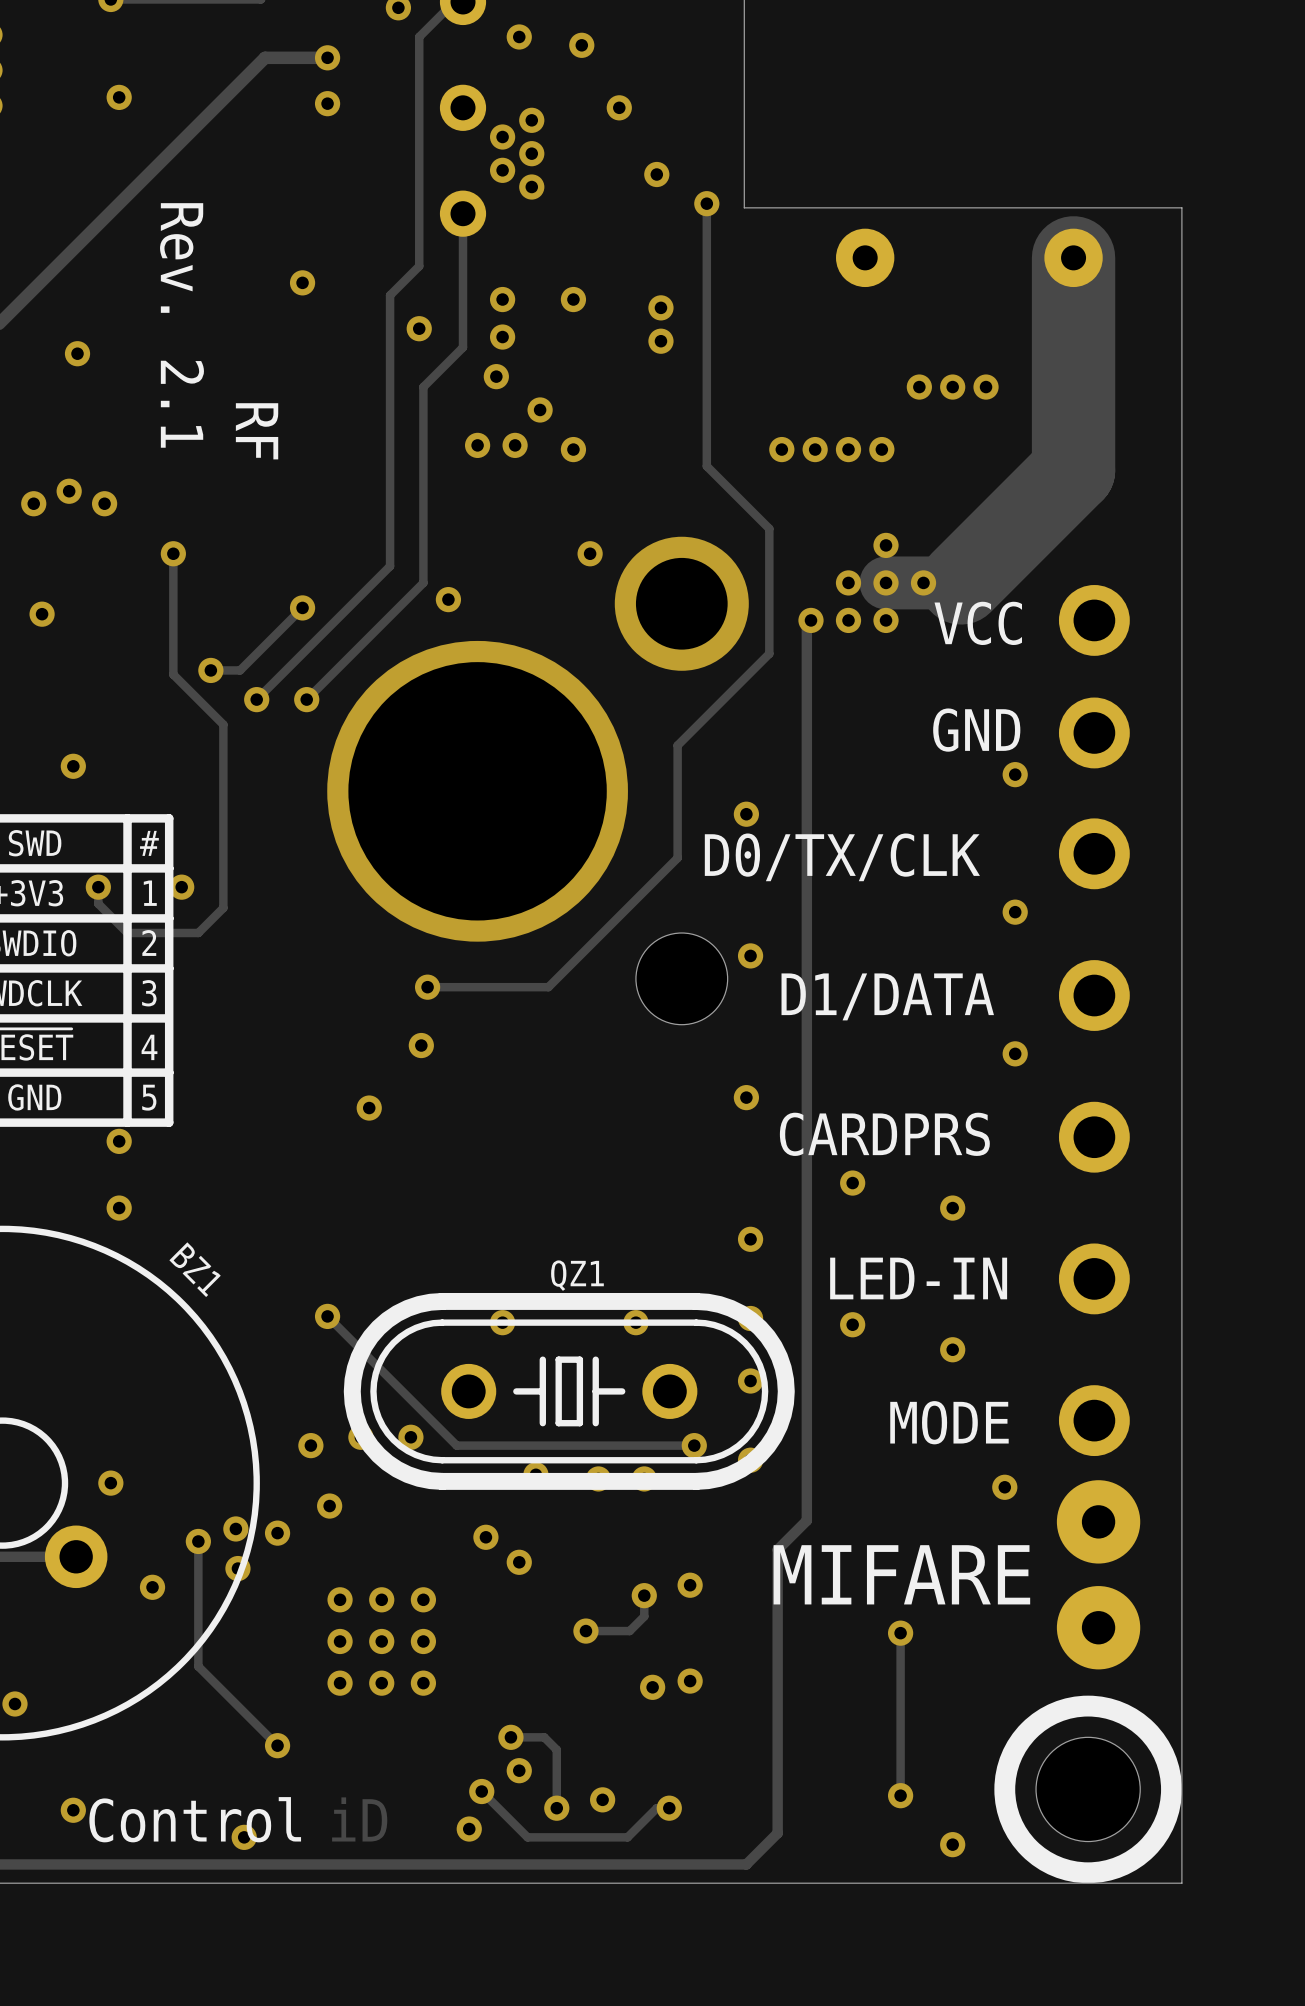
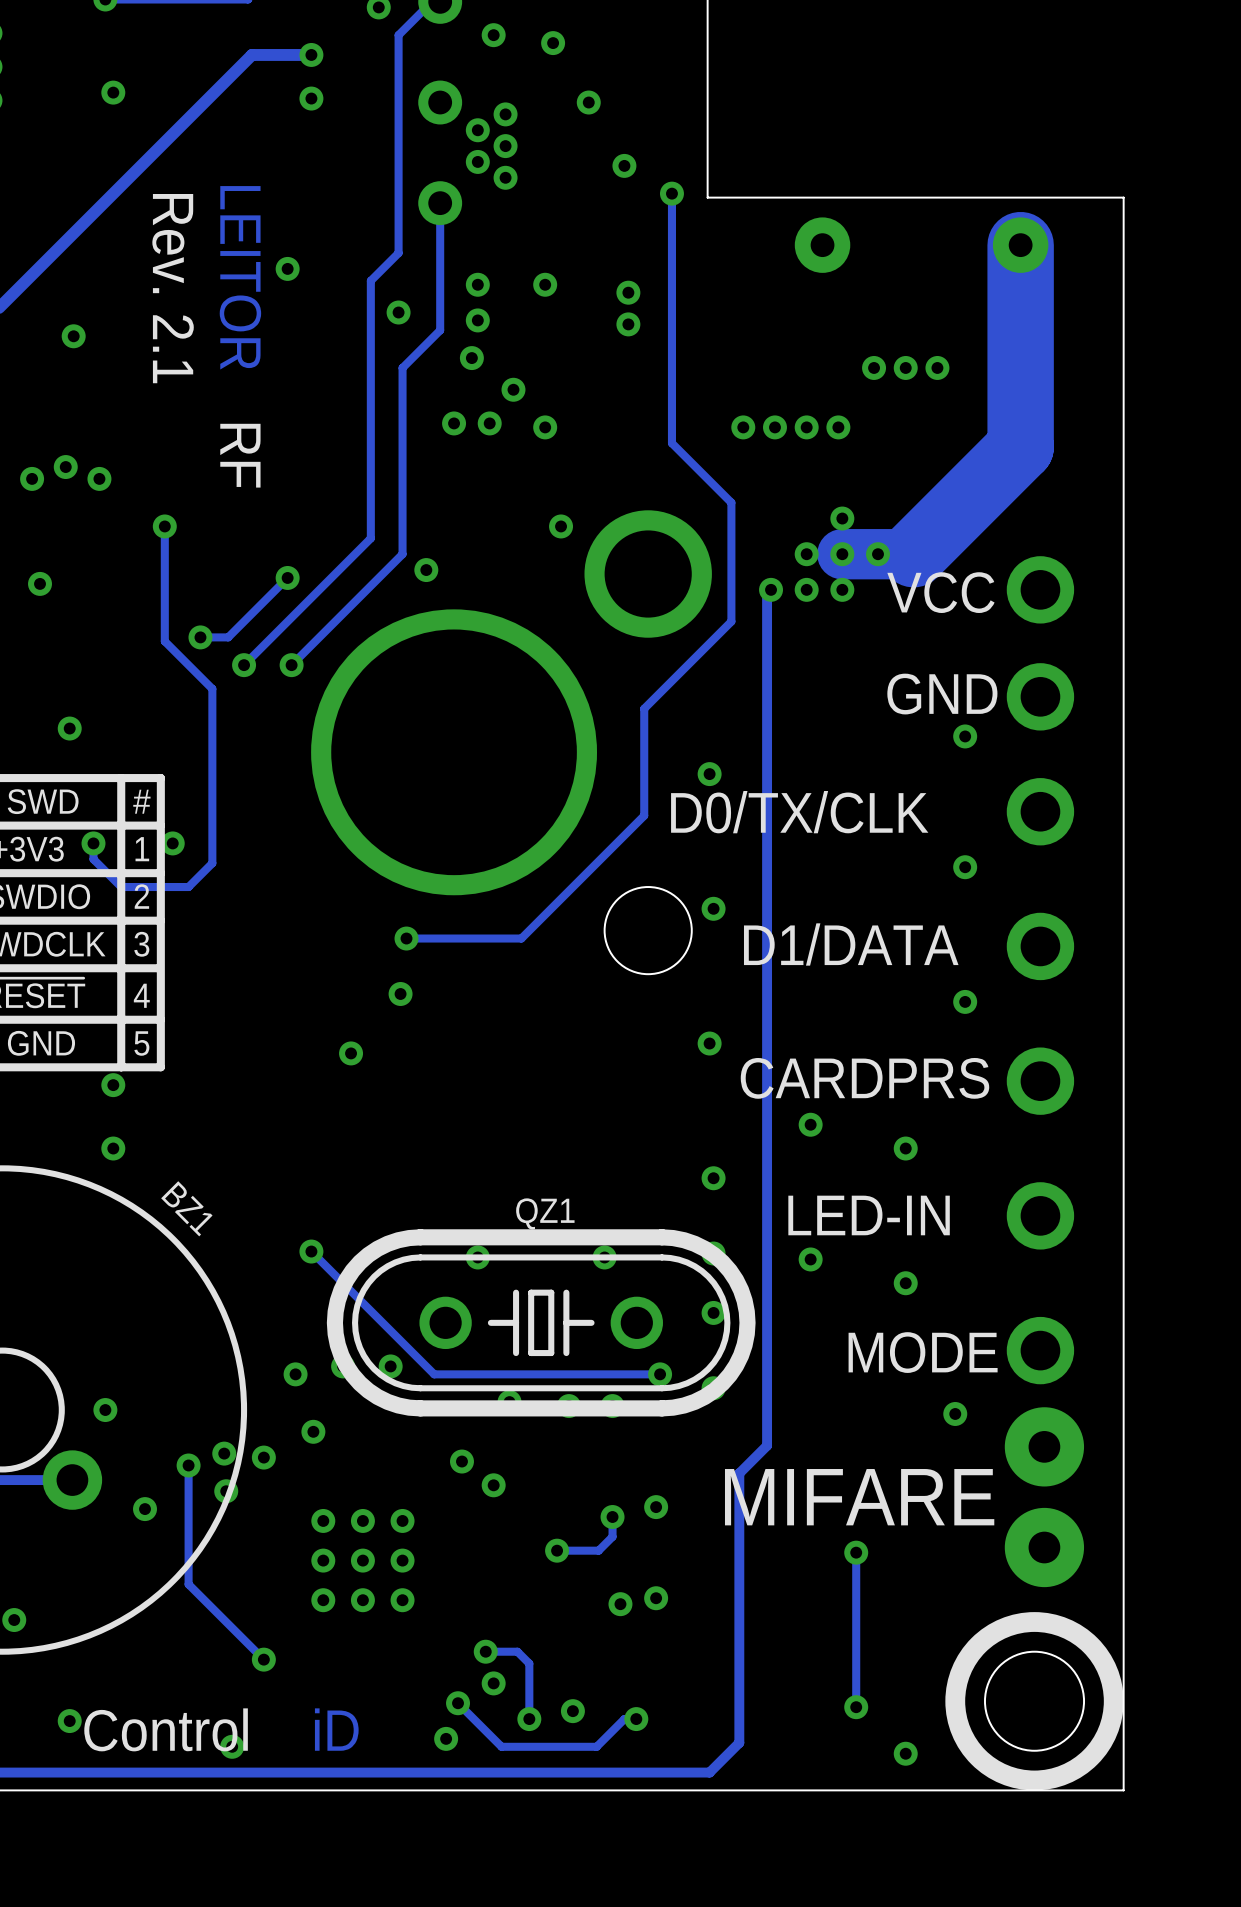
track width: thick (1073, 257) (1073, 470) (961, 582) -> thin (1020, 245) (1020, 447) (913, 554)
text: none -> LEITOR (240, 277)
text position: RF (257, 431) -> RF (240, 455)

